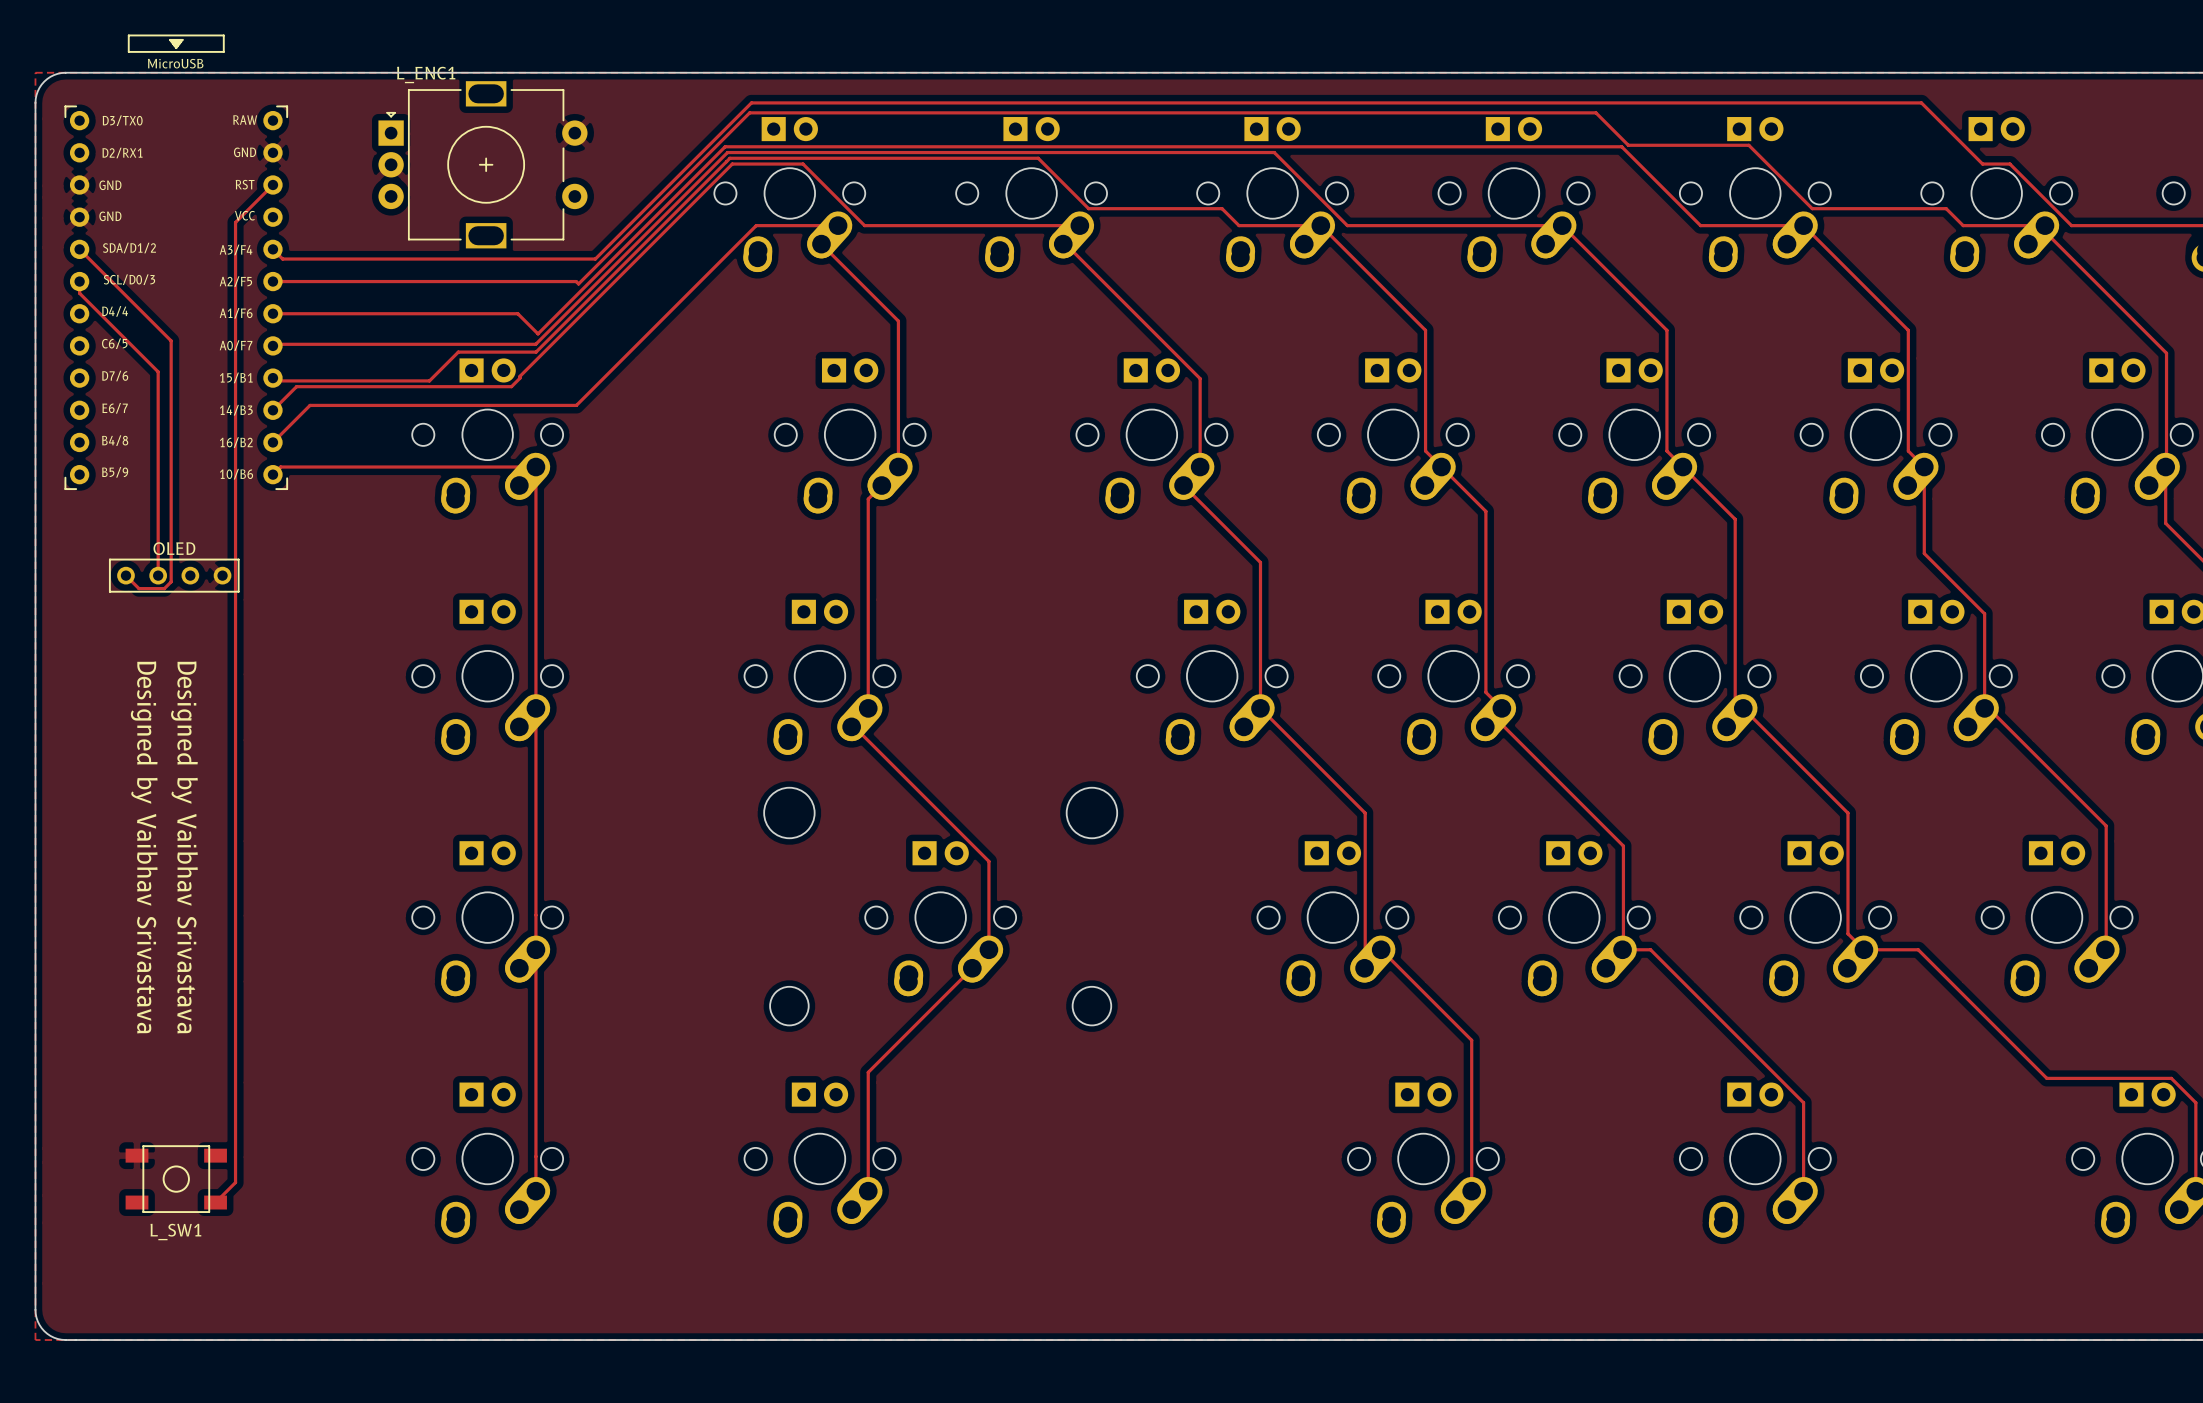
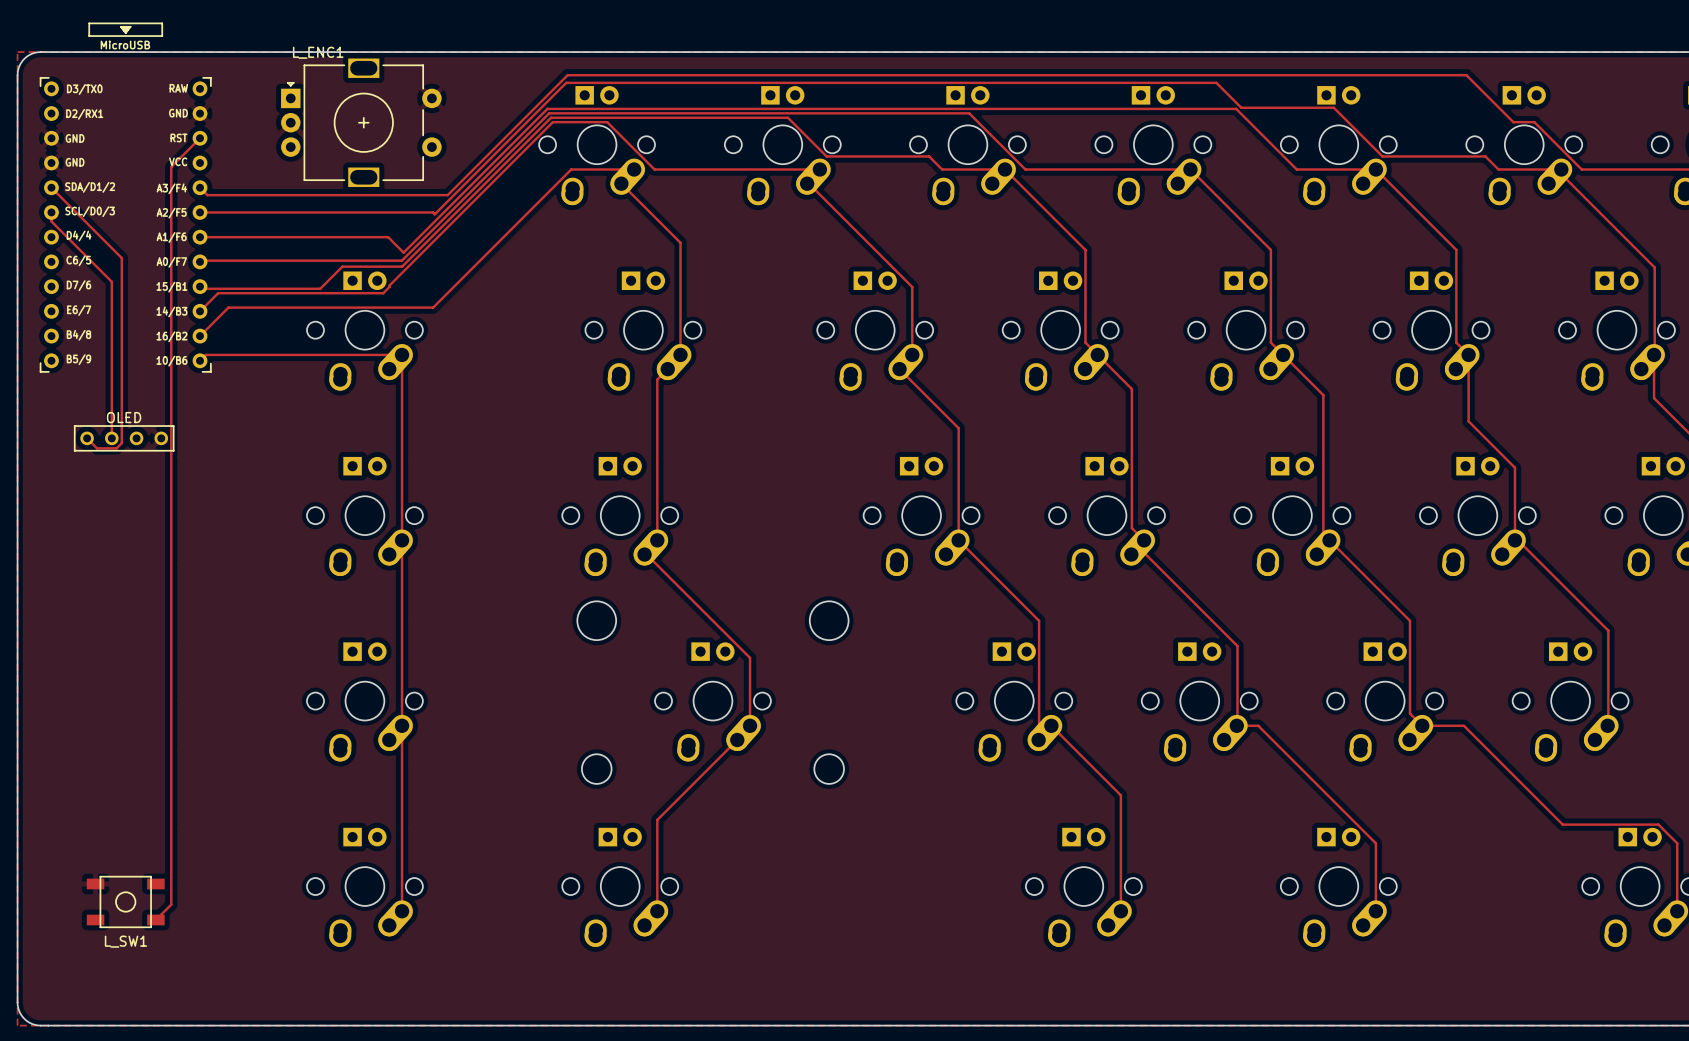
text: Designed by Vaibhav Srivastava (144, 847) -> none
text: Designed by Vaibhav Srivastava (184, 847) -> none

